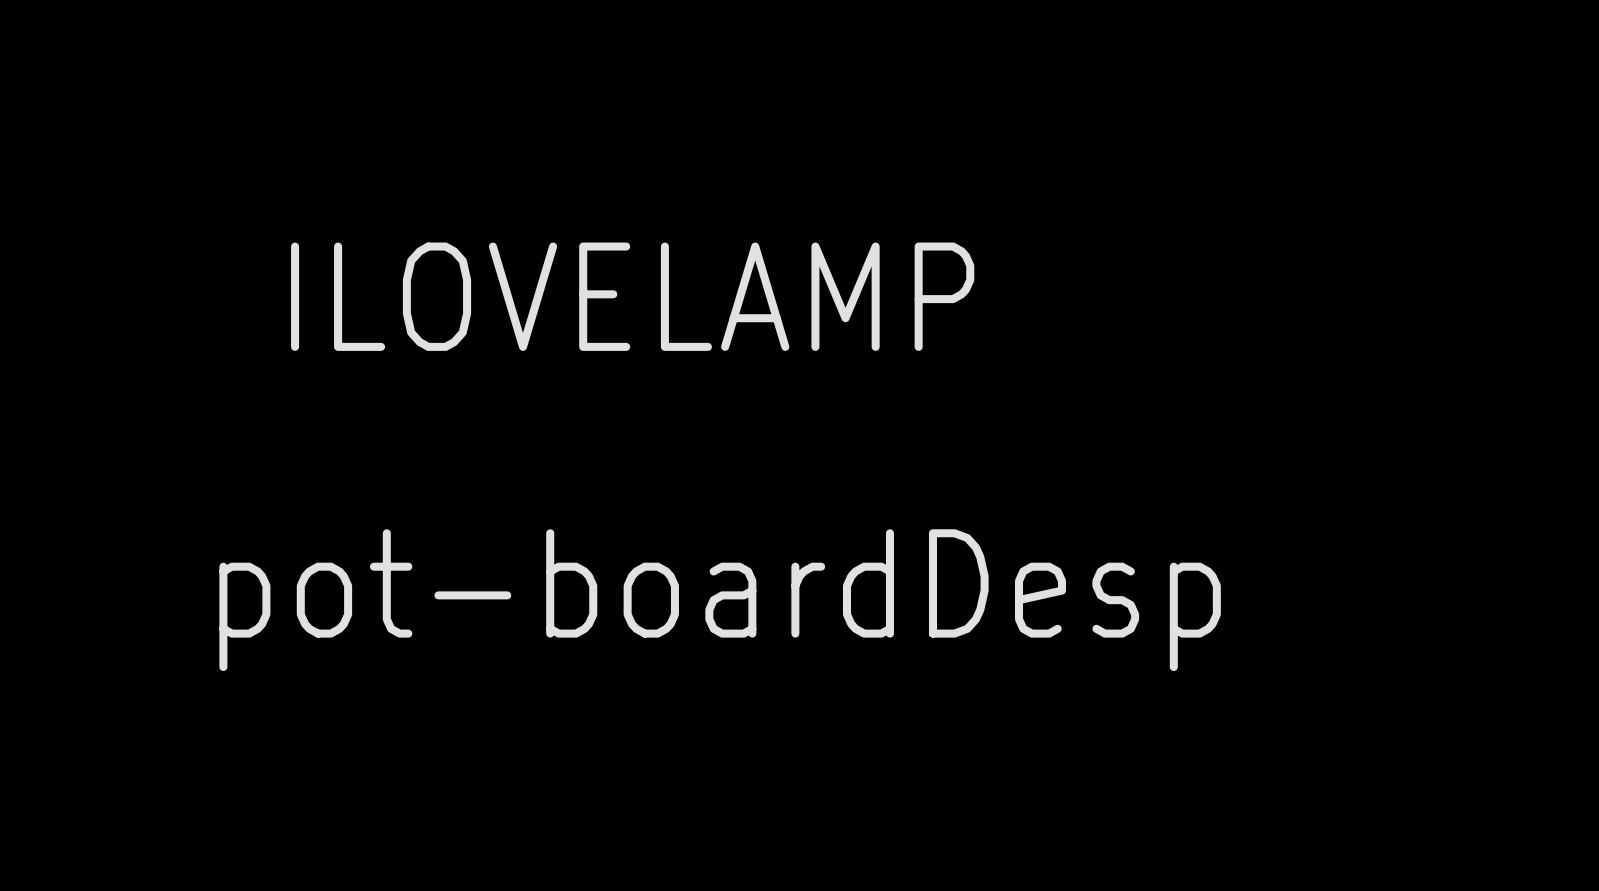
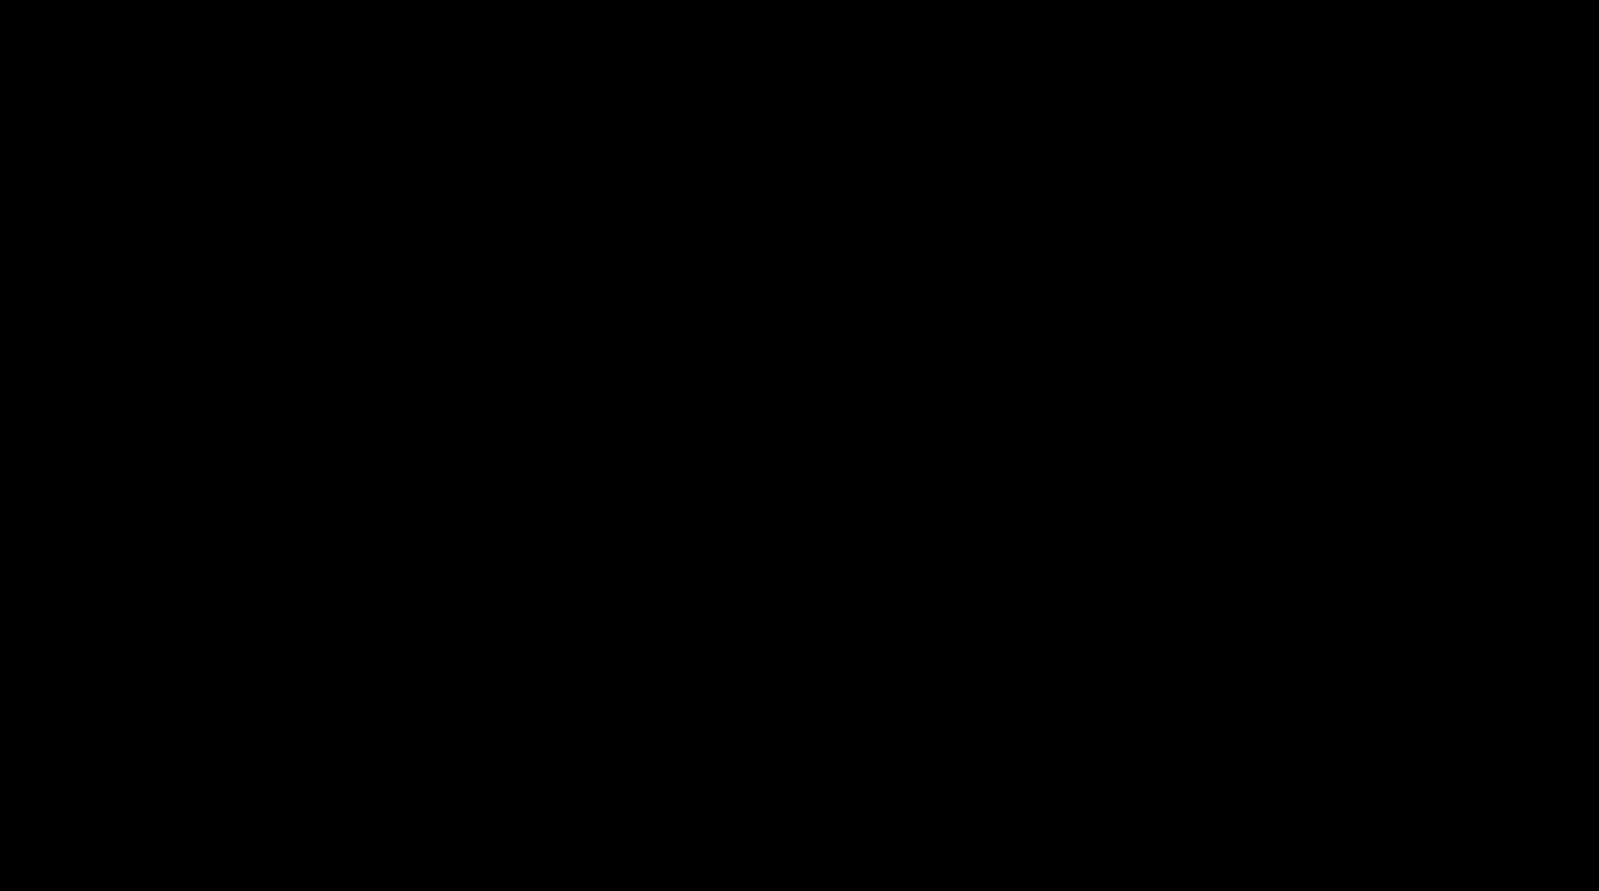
text: ILOVELAMP (632, 296) -> none
text: pot-boardDesp (720, 600) -> none

